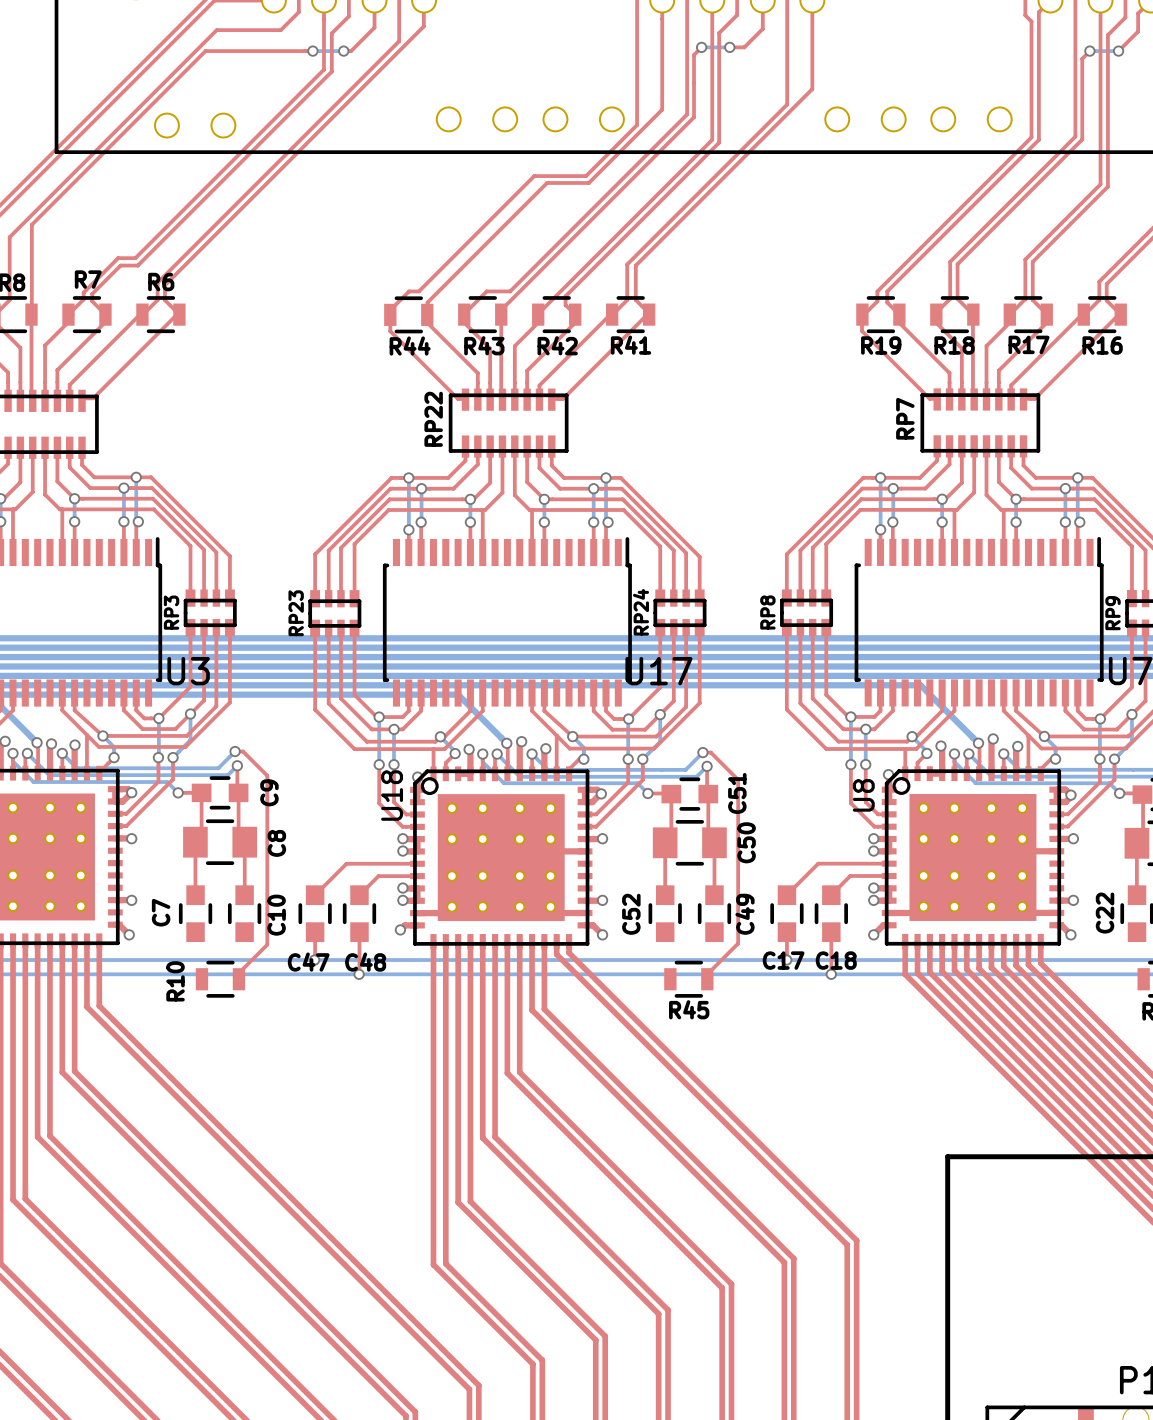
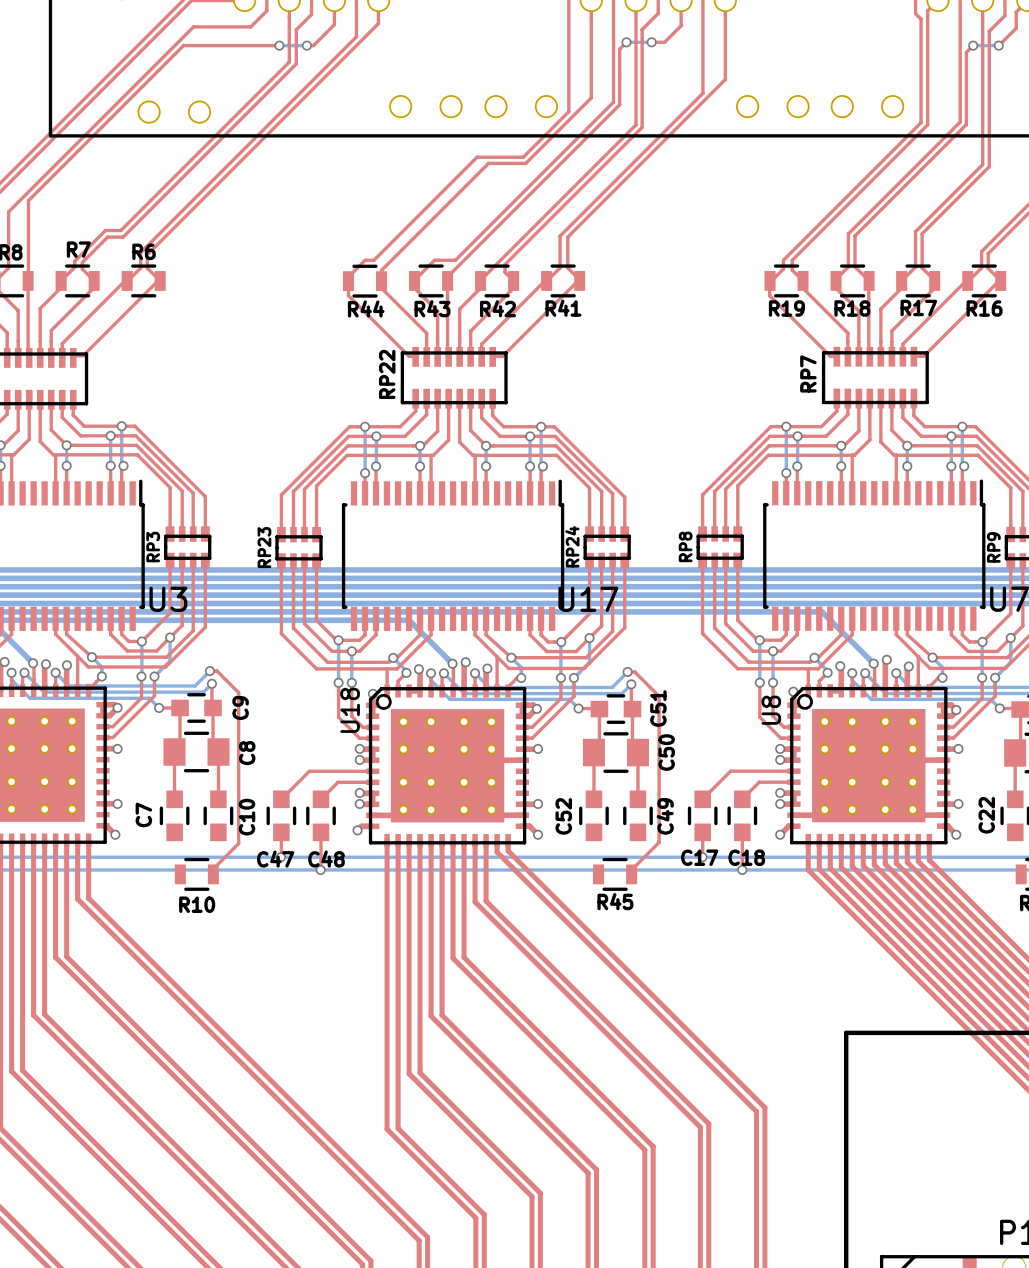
R10 name rotation: 0° (175, 981) -> 90° clockwise (197, 904)
R10 name position: R10 (175, 981) -> R10 (197, 904)

